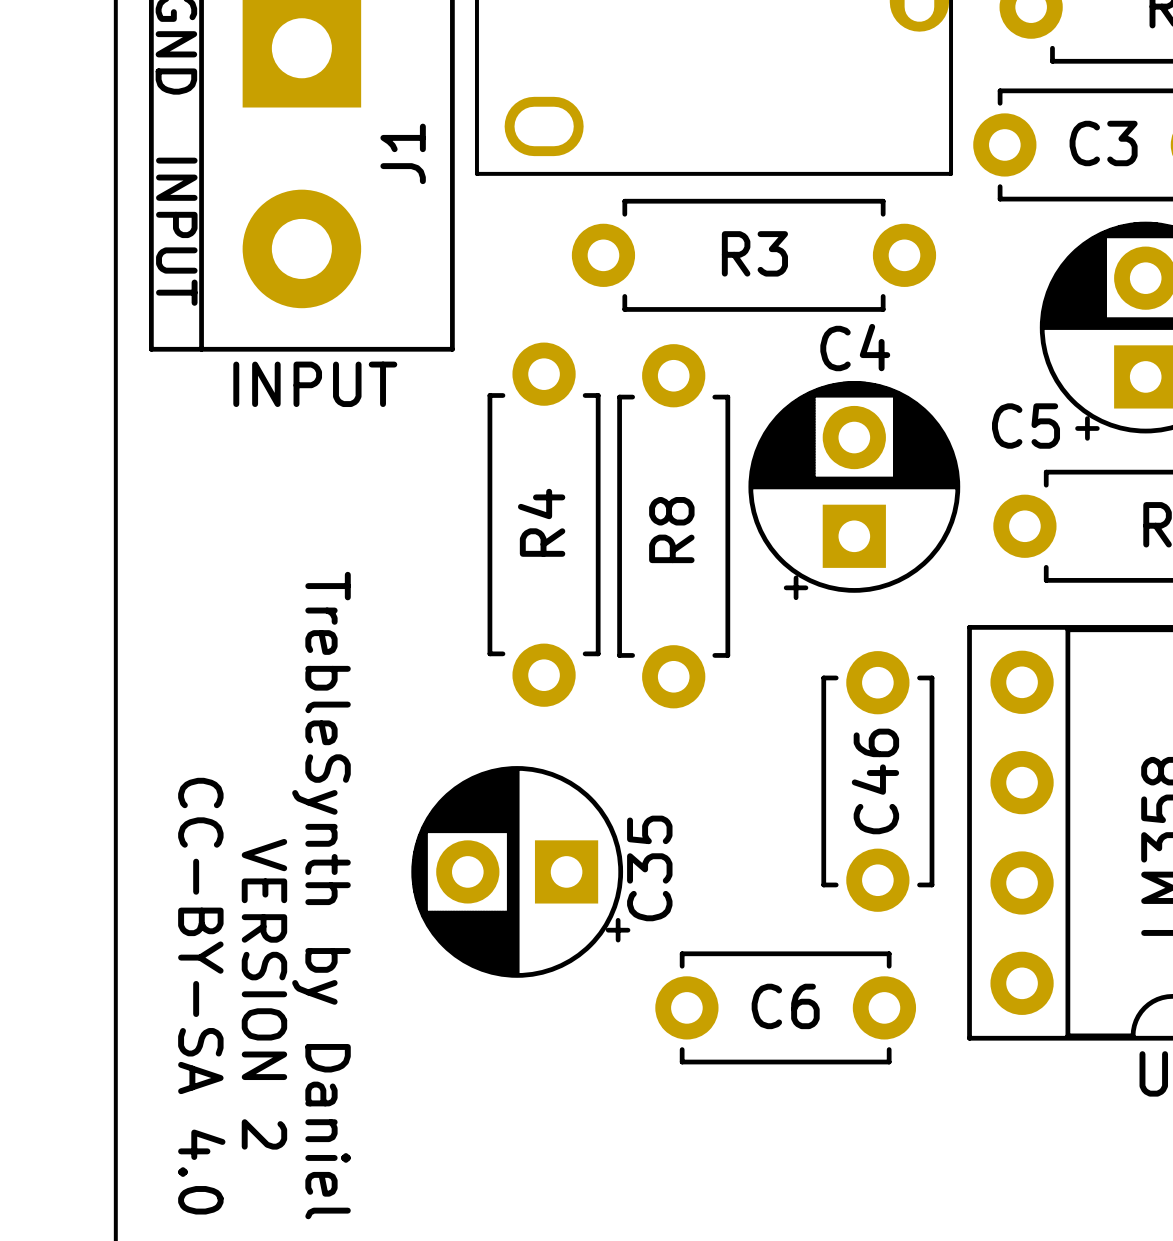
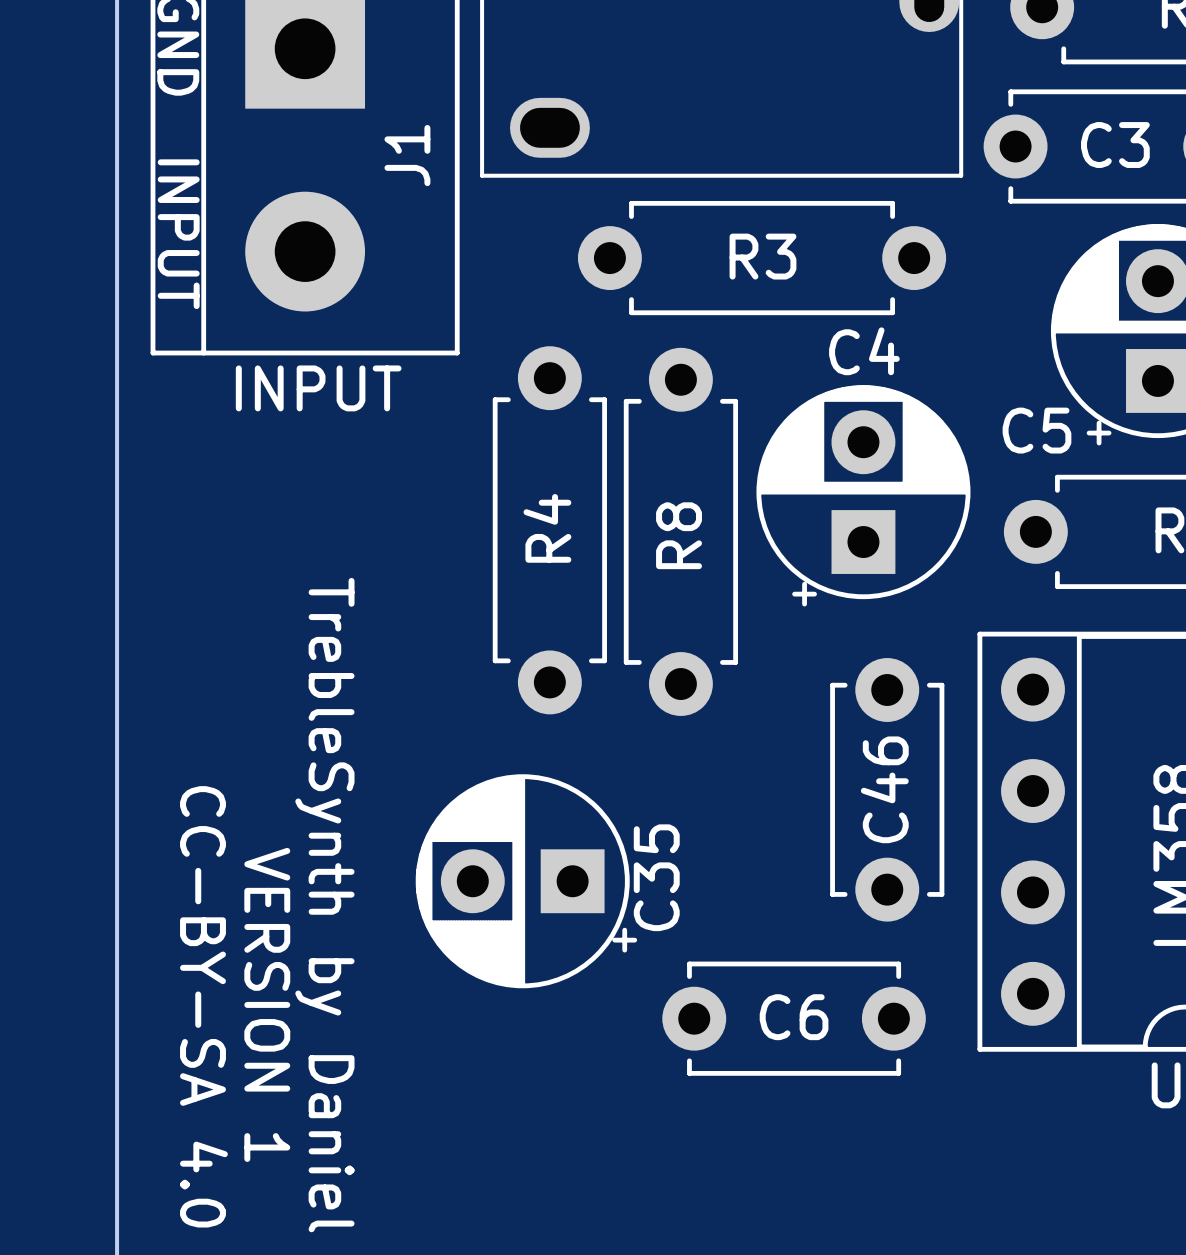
text: VERSION 2 (264, 994) -> VERSION 1 (267, 1004)

